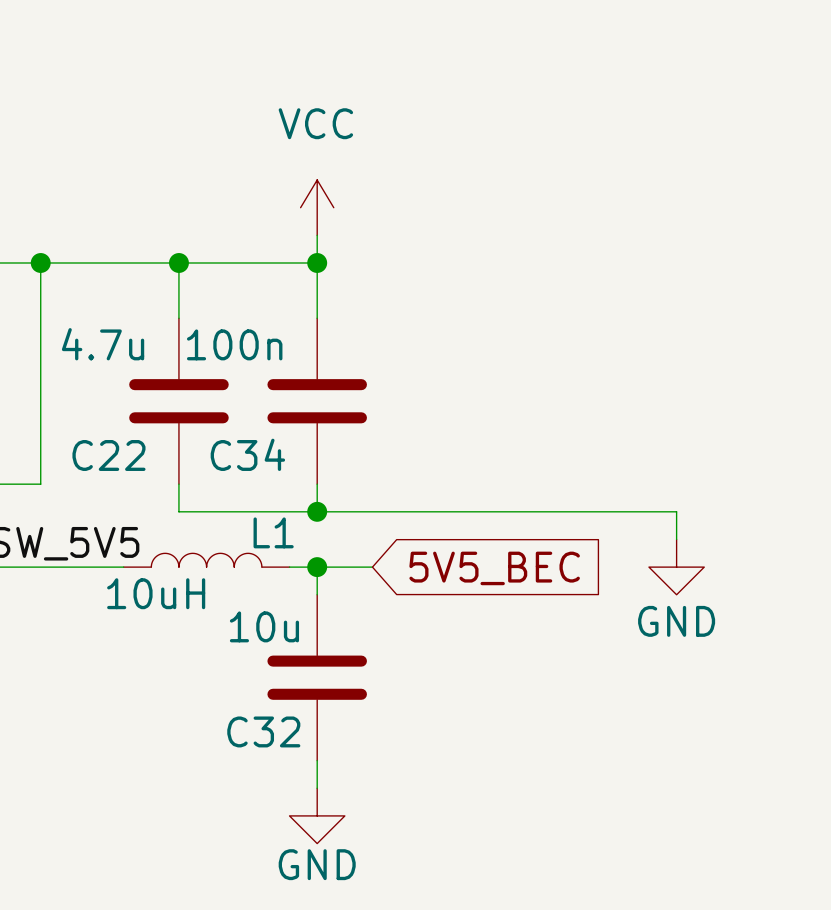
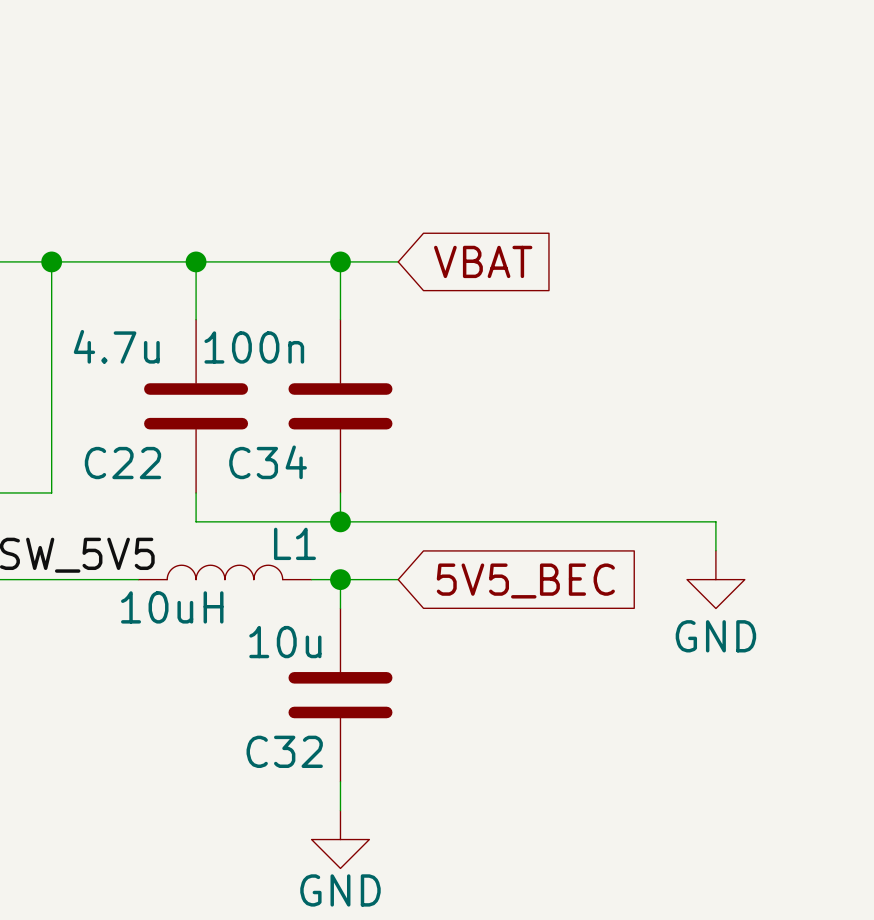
power symbol: VCC (317, 207) -> none
wire: (317, 235) (317, 262) -> (398, 261) (340, 261)
global label: none -> VBAT (483, 261)

